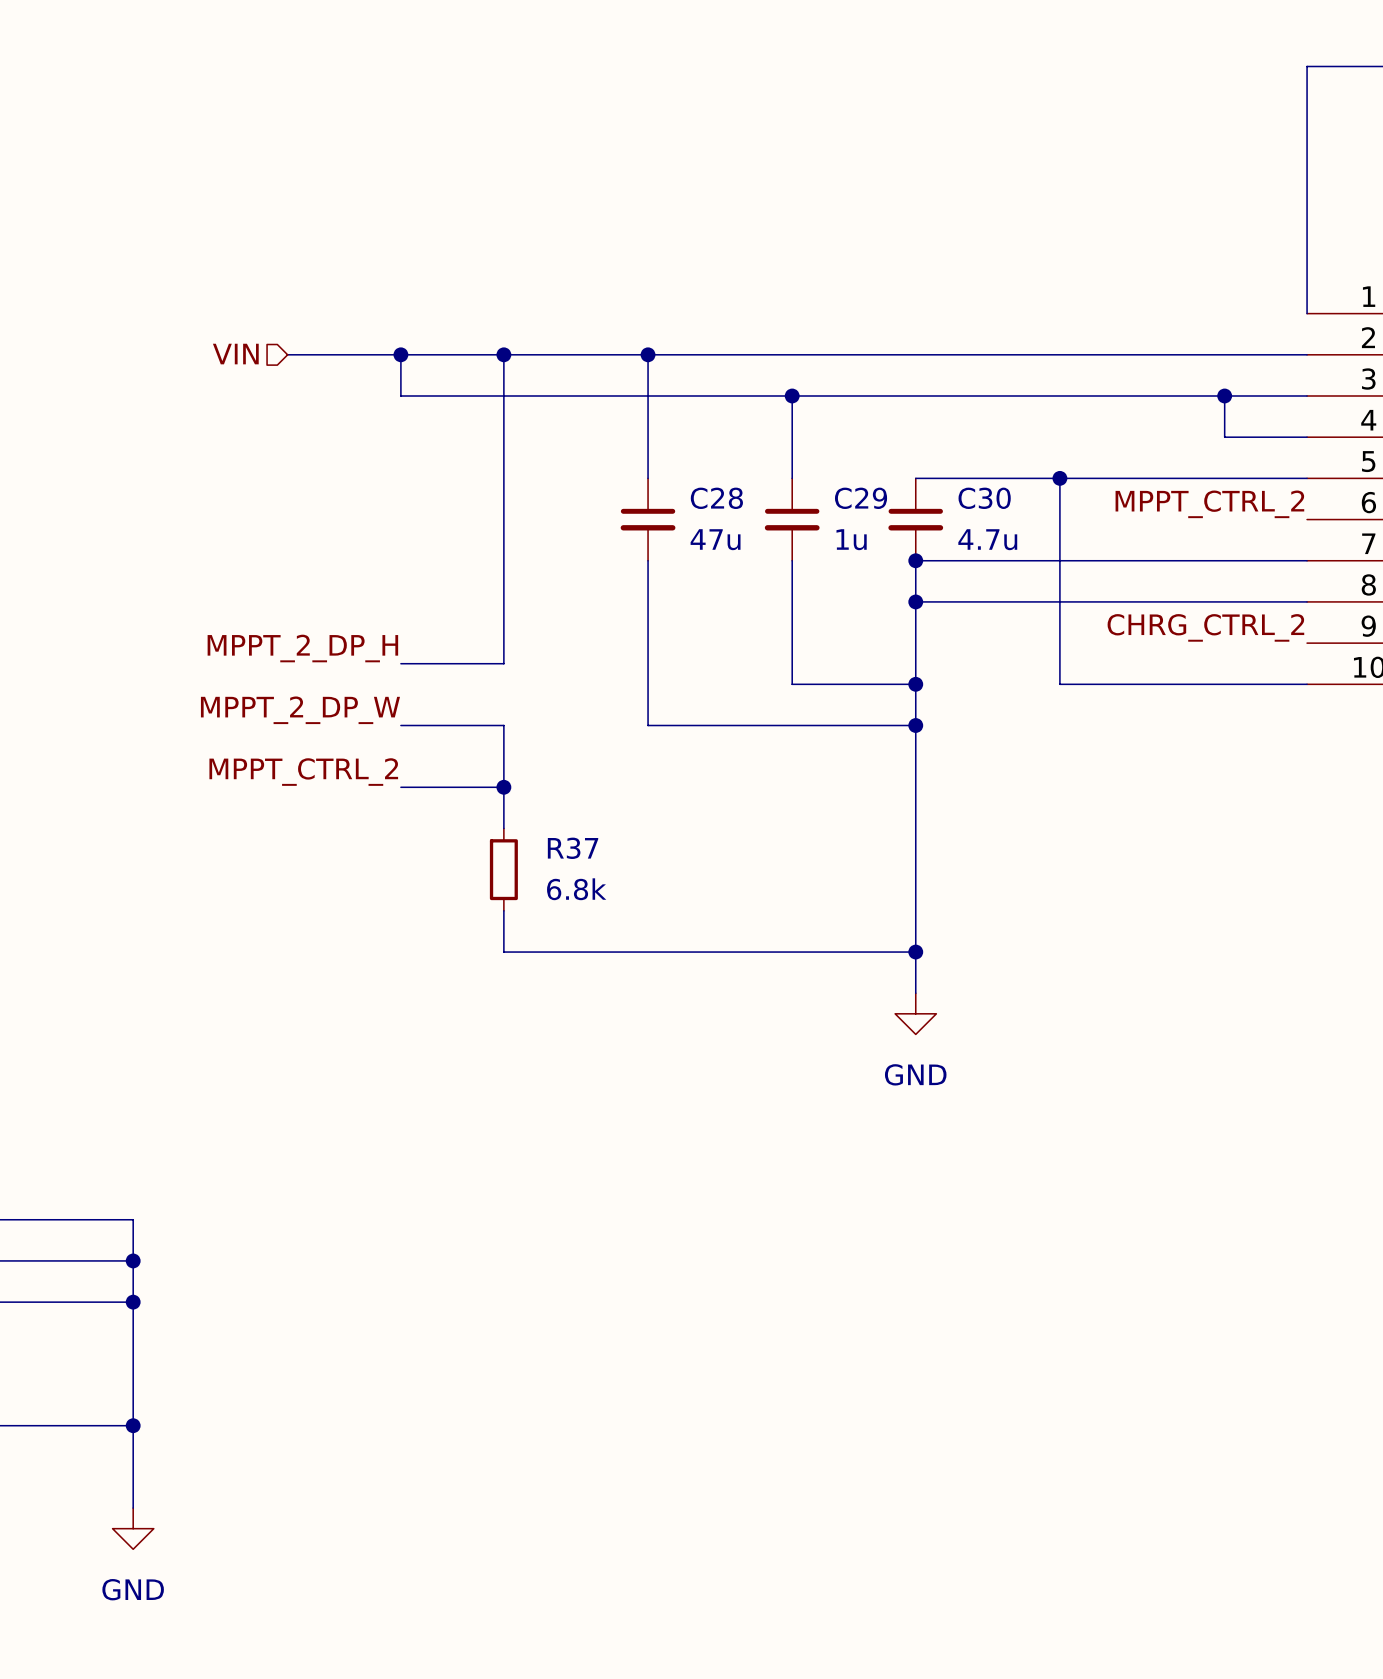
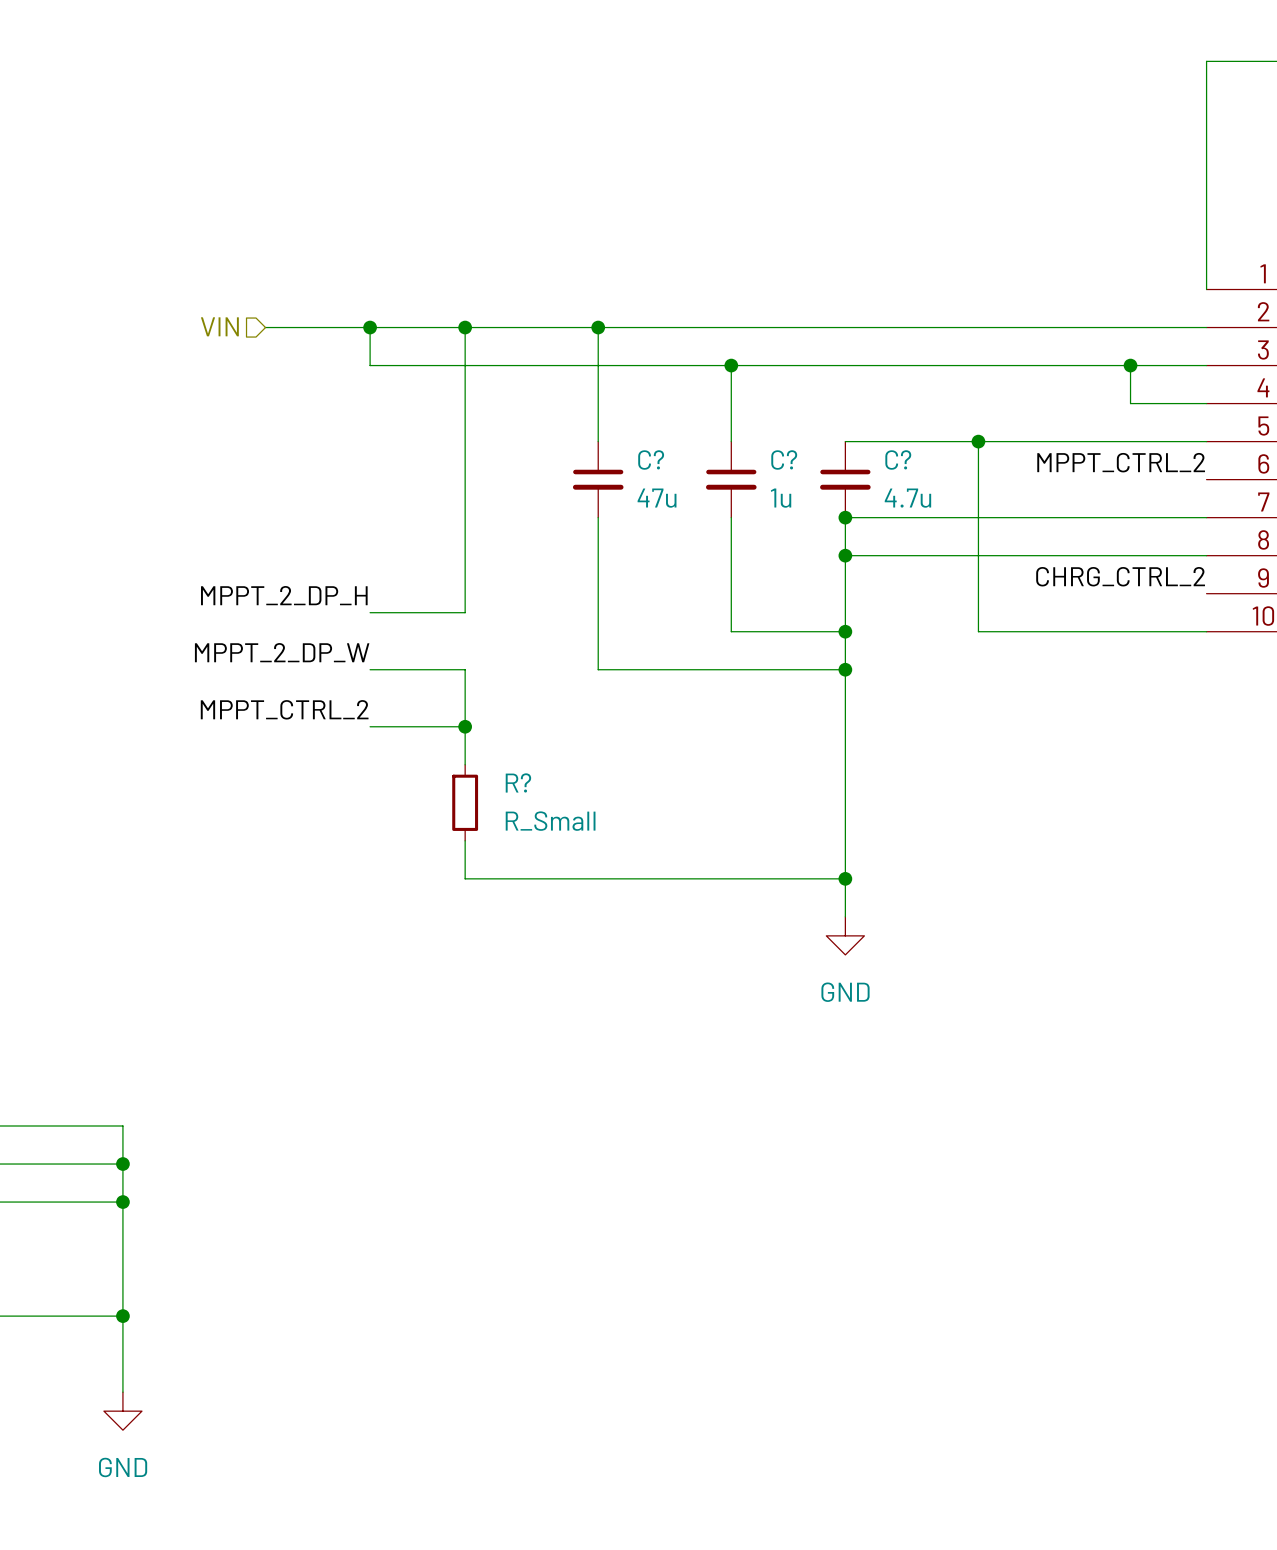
C28 name: C28 (716, 498) -> C? (651, 459)
C29 name: C29 (861, 498) -> C? (784, 459)
C30 name: C30 (984, 498) -> C? (898, 459)
R37 name: R37 (573, 848) -> R? (518, 782)
R37 value: 6.8k (576, 889) -> R_Small (550, 821)

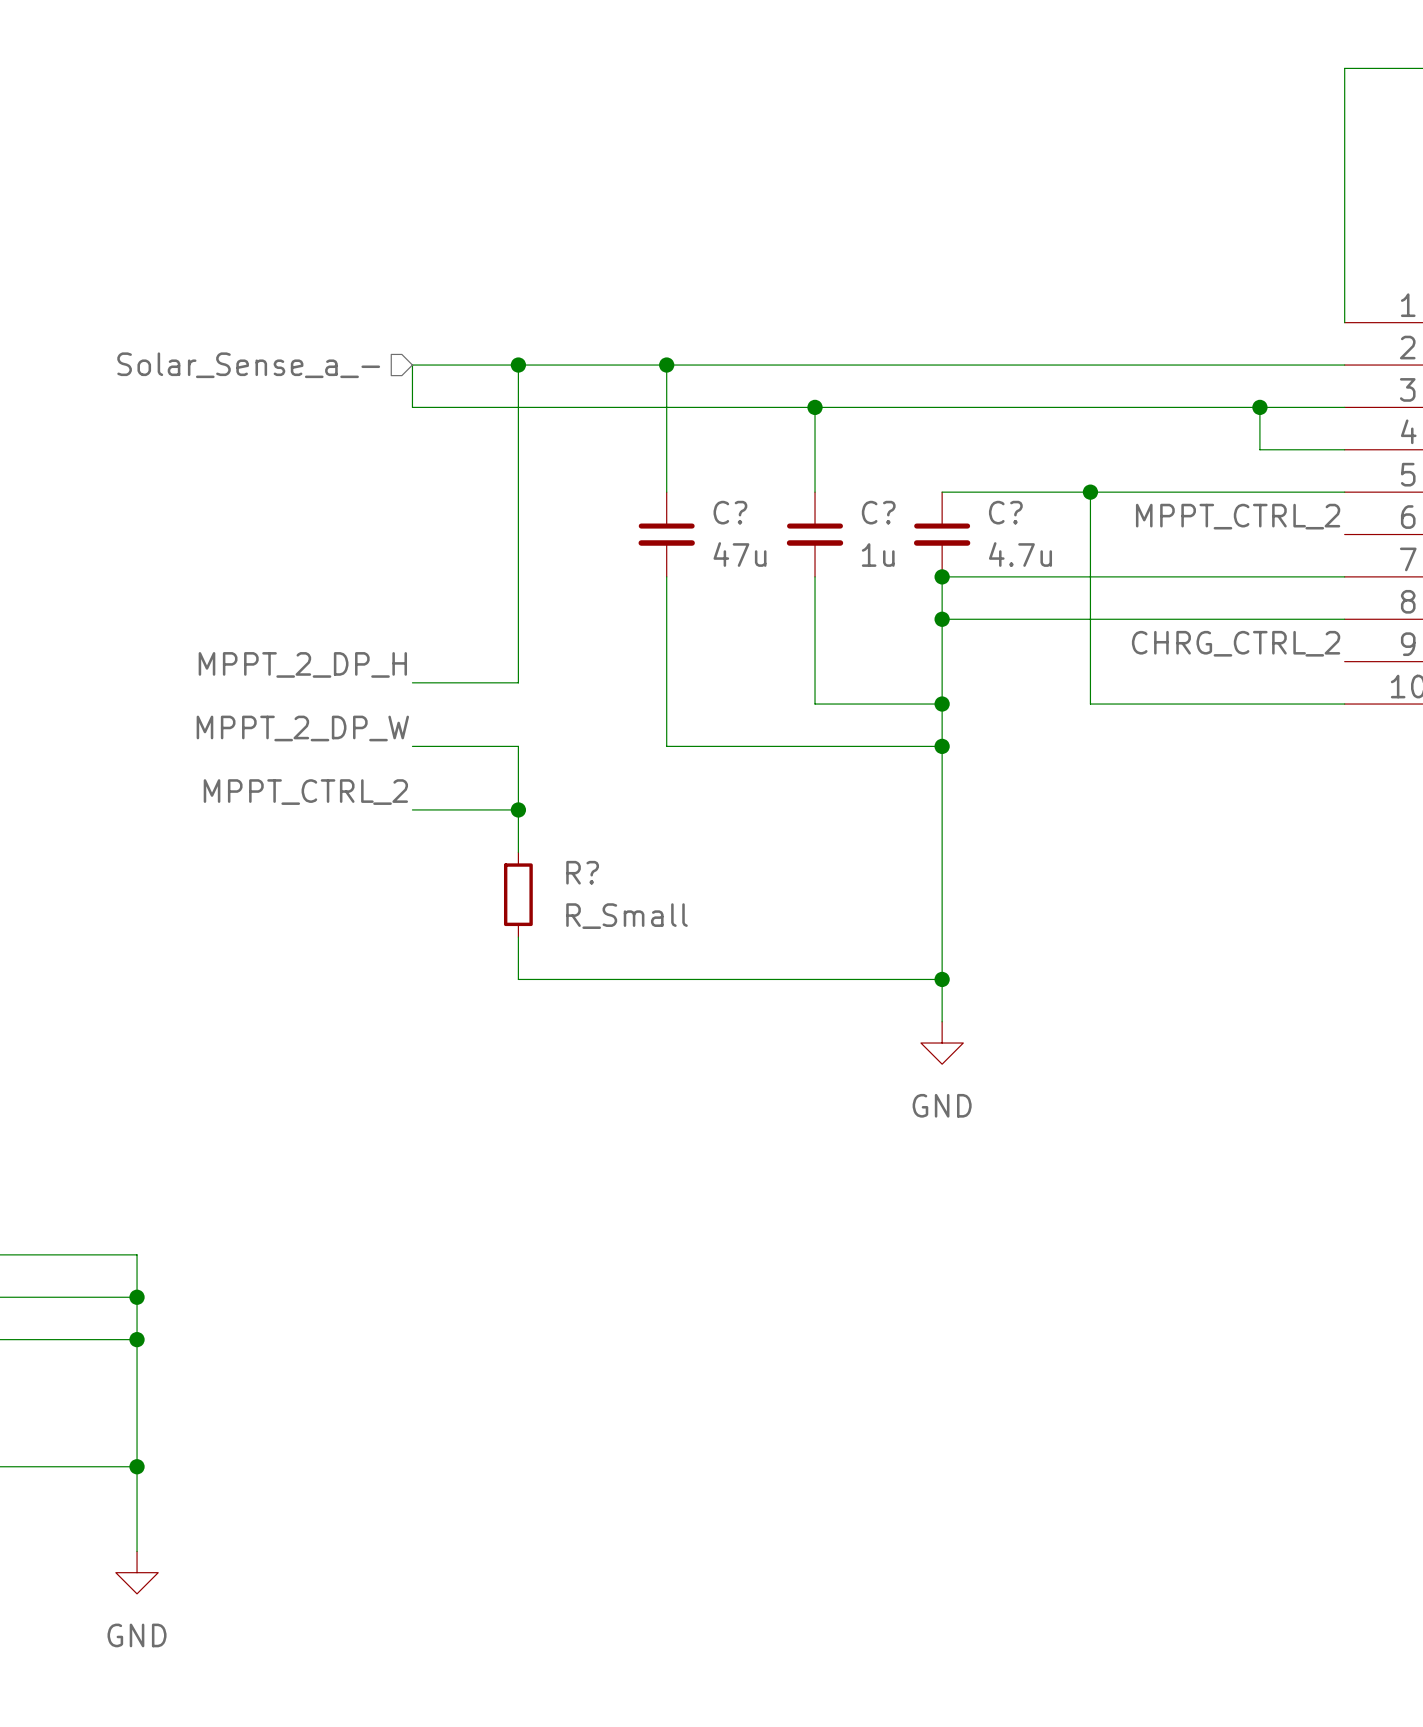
hierarchical label: VIN (219, 326) -> none
hierarchical label: none -> Solar_Sense_a_- (248, 365)
wire: (265, 327) (370, 327) -> none
junction: (370, 327) -> none

